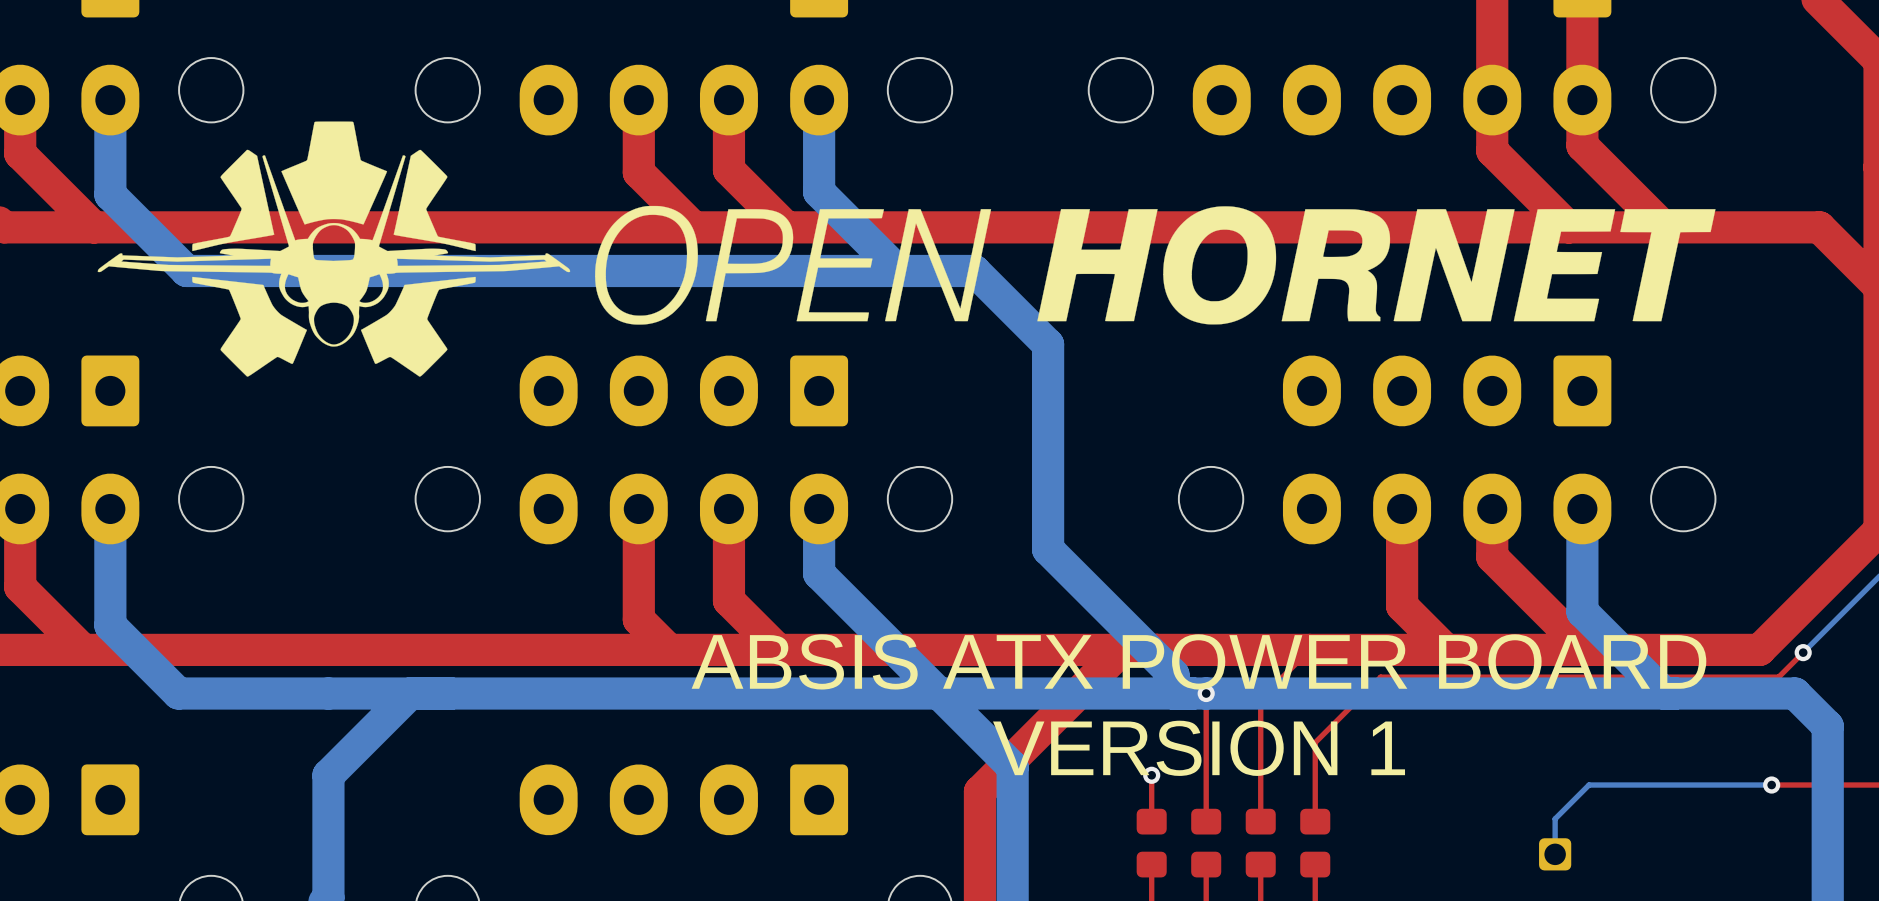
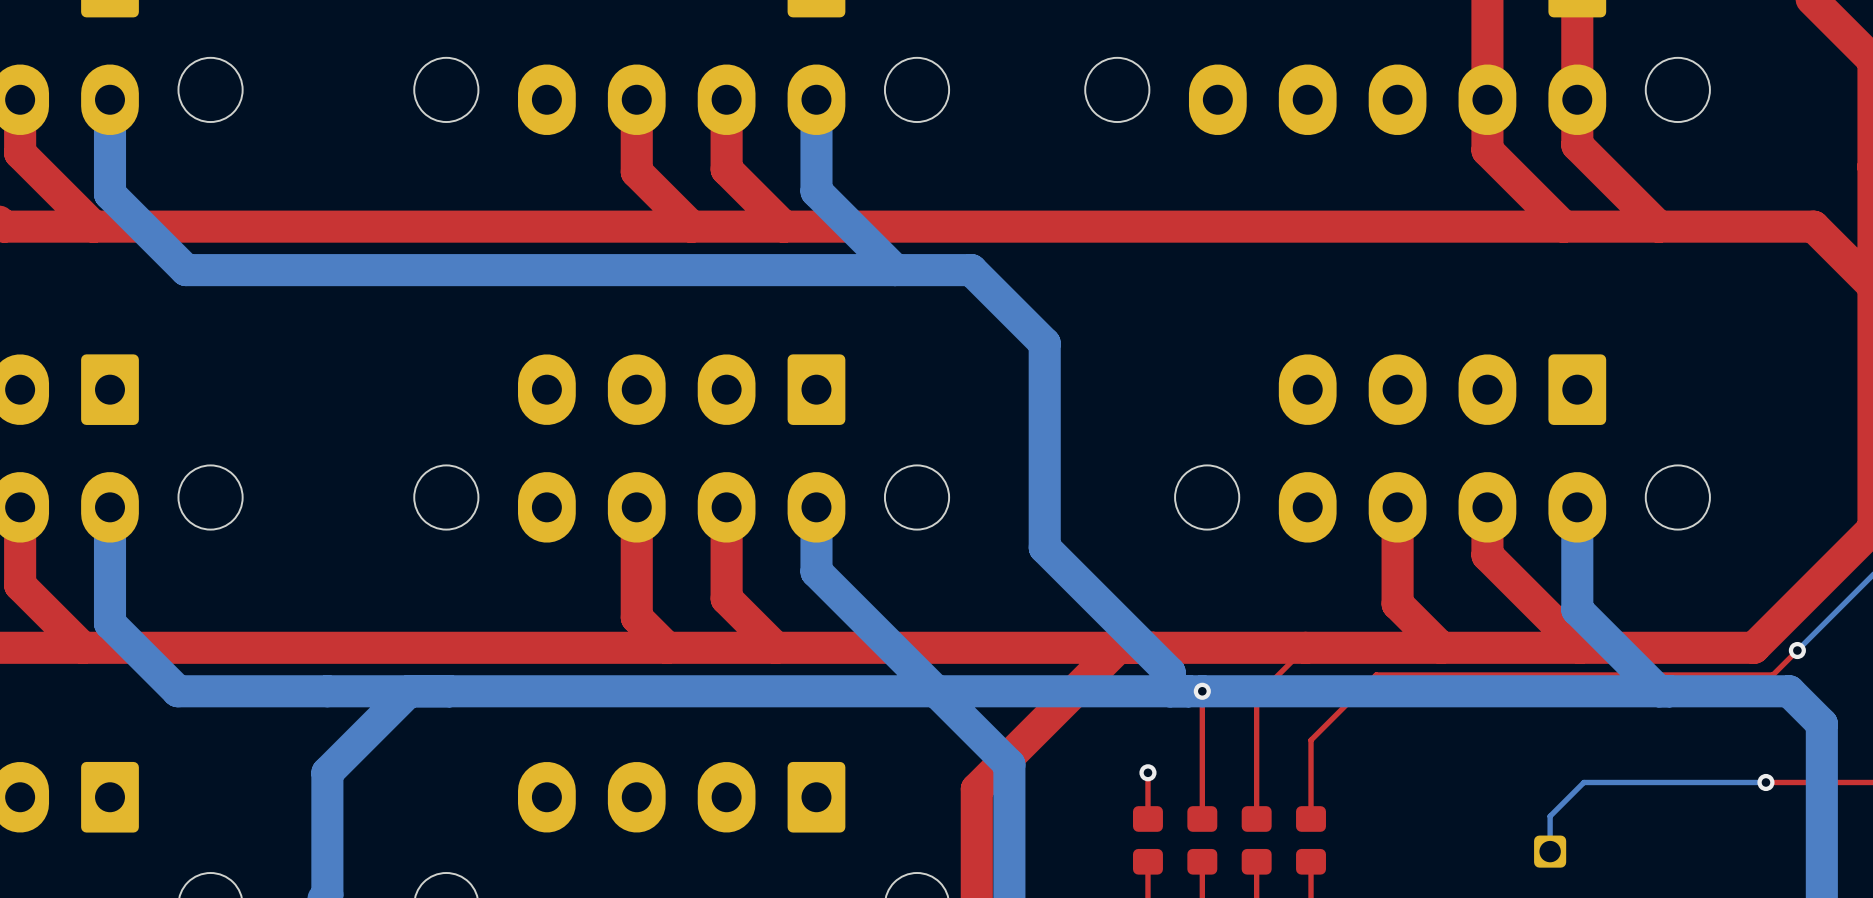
drawing: [97, 121, 1716, 377] -> none
text: ABSIS ATX POWER BOARD (1198, 661) -> none
text: VERSION 1 (1199, 748) -> none

